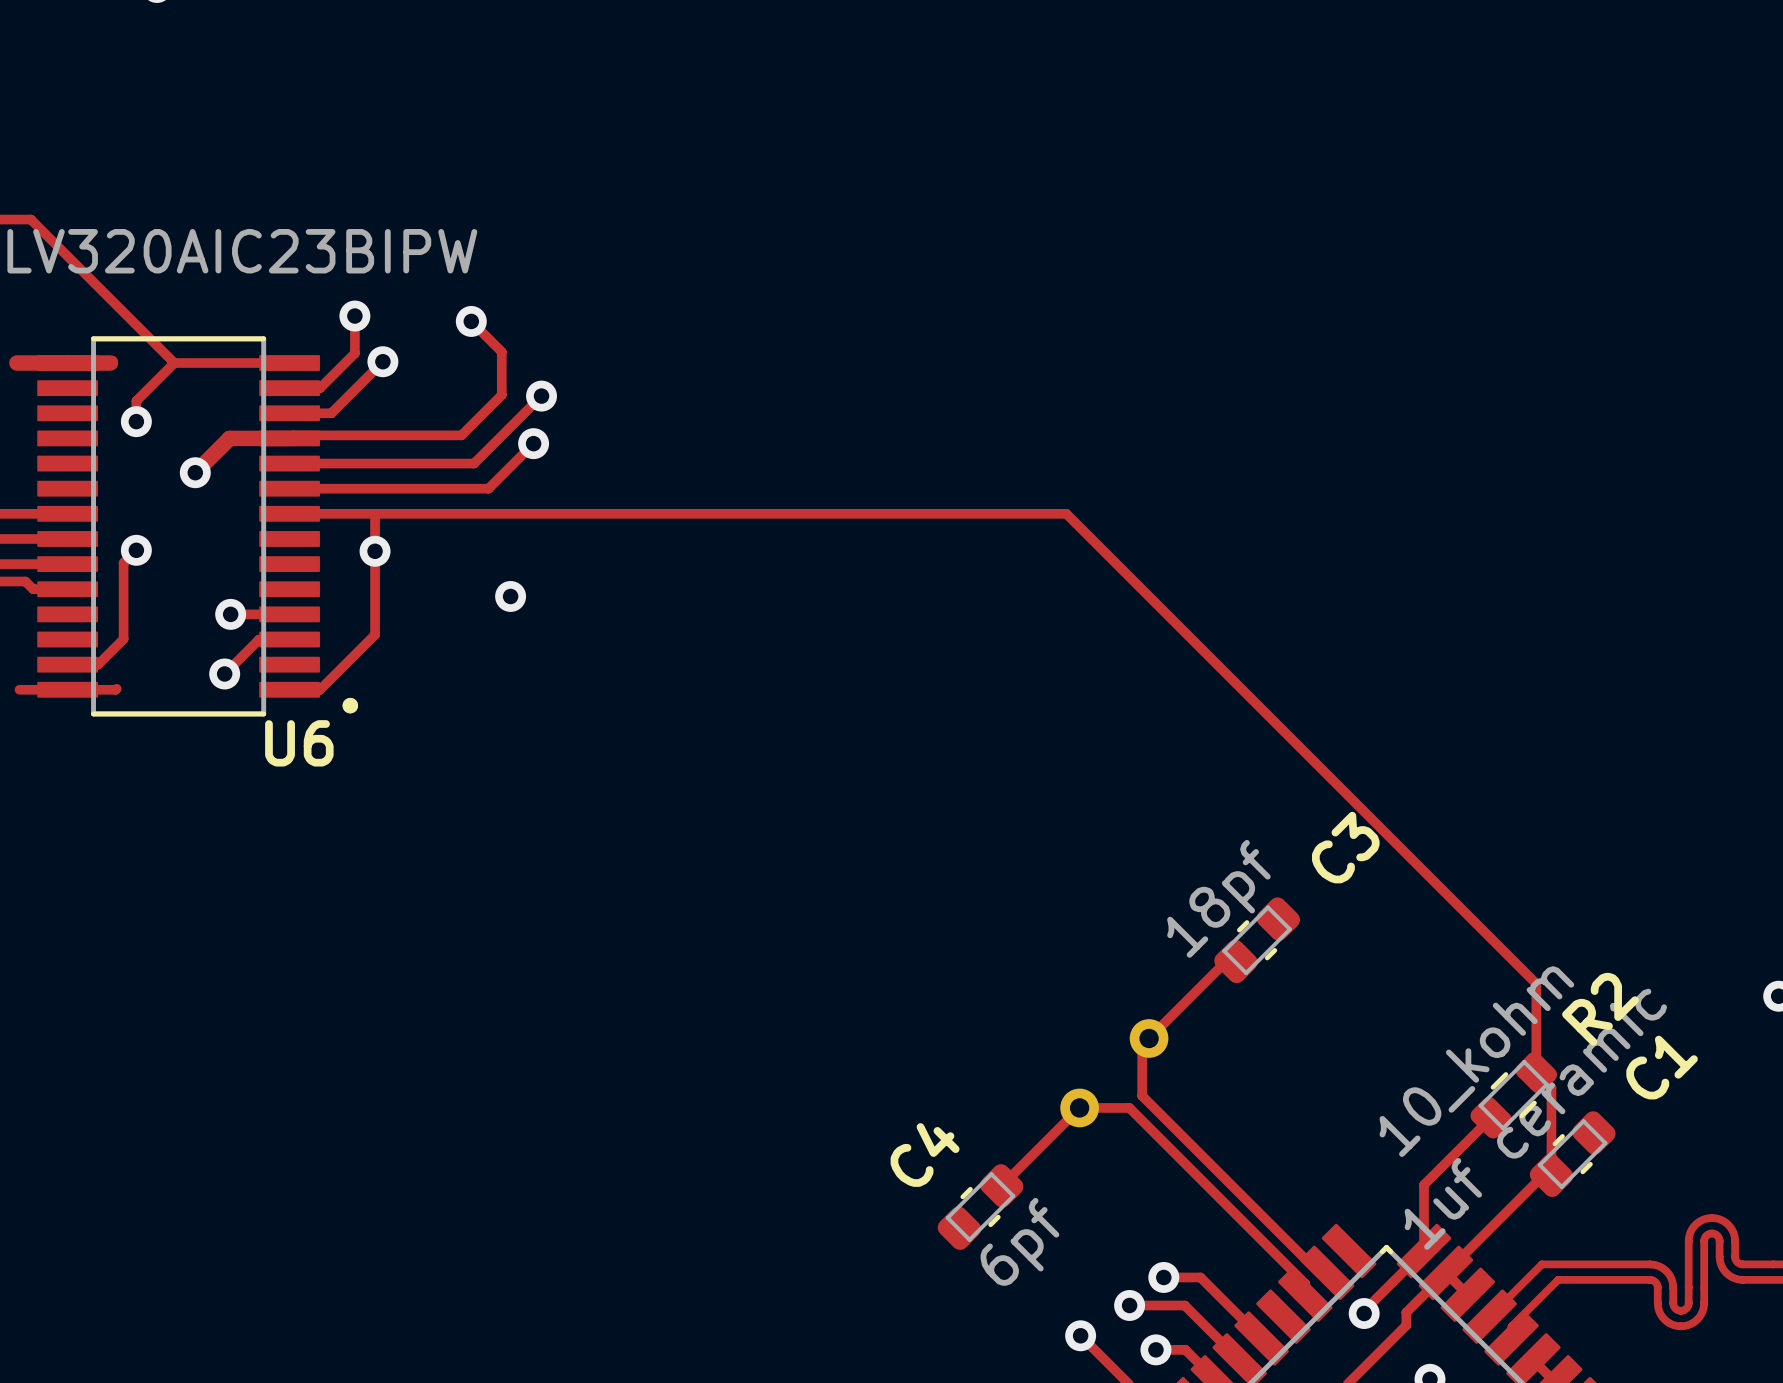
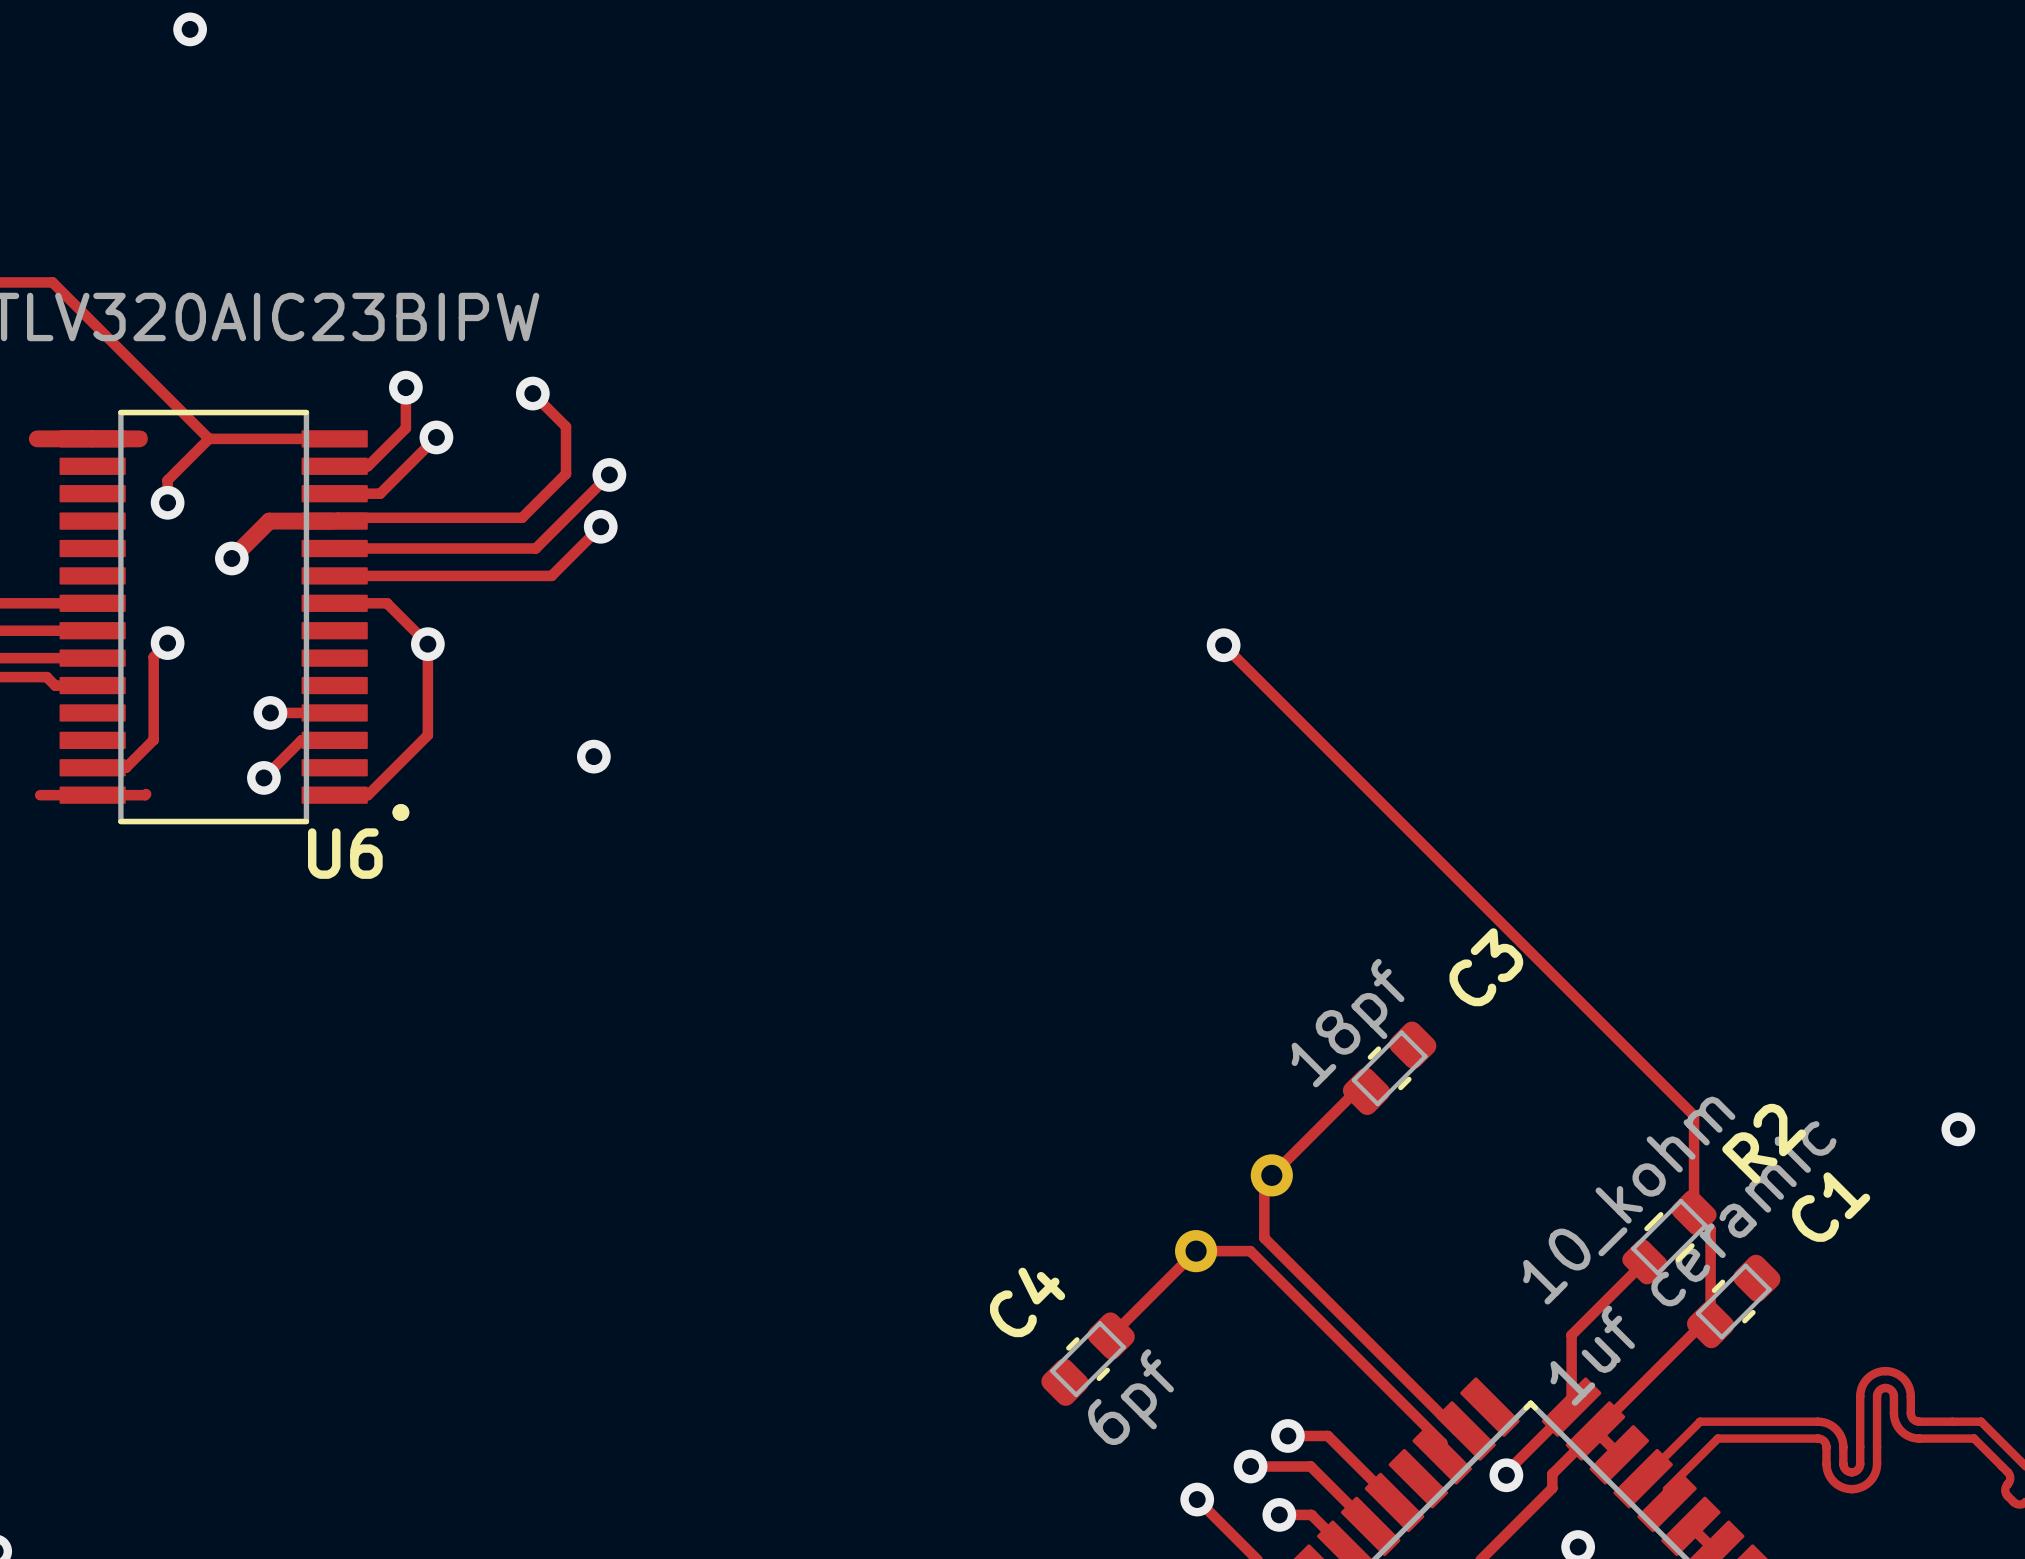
track: (337, 513) (1066, 513) (1104, 552) -> none
track: (375, 513) (375, 551) -> (387, 603) (427, 644)
via: none -> (1223, 645)
via position: (510, 596) -> (593, 756)

